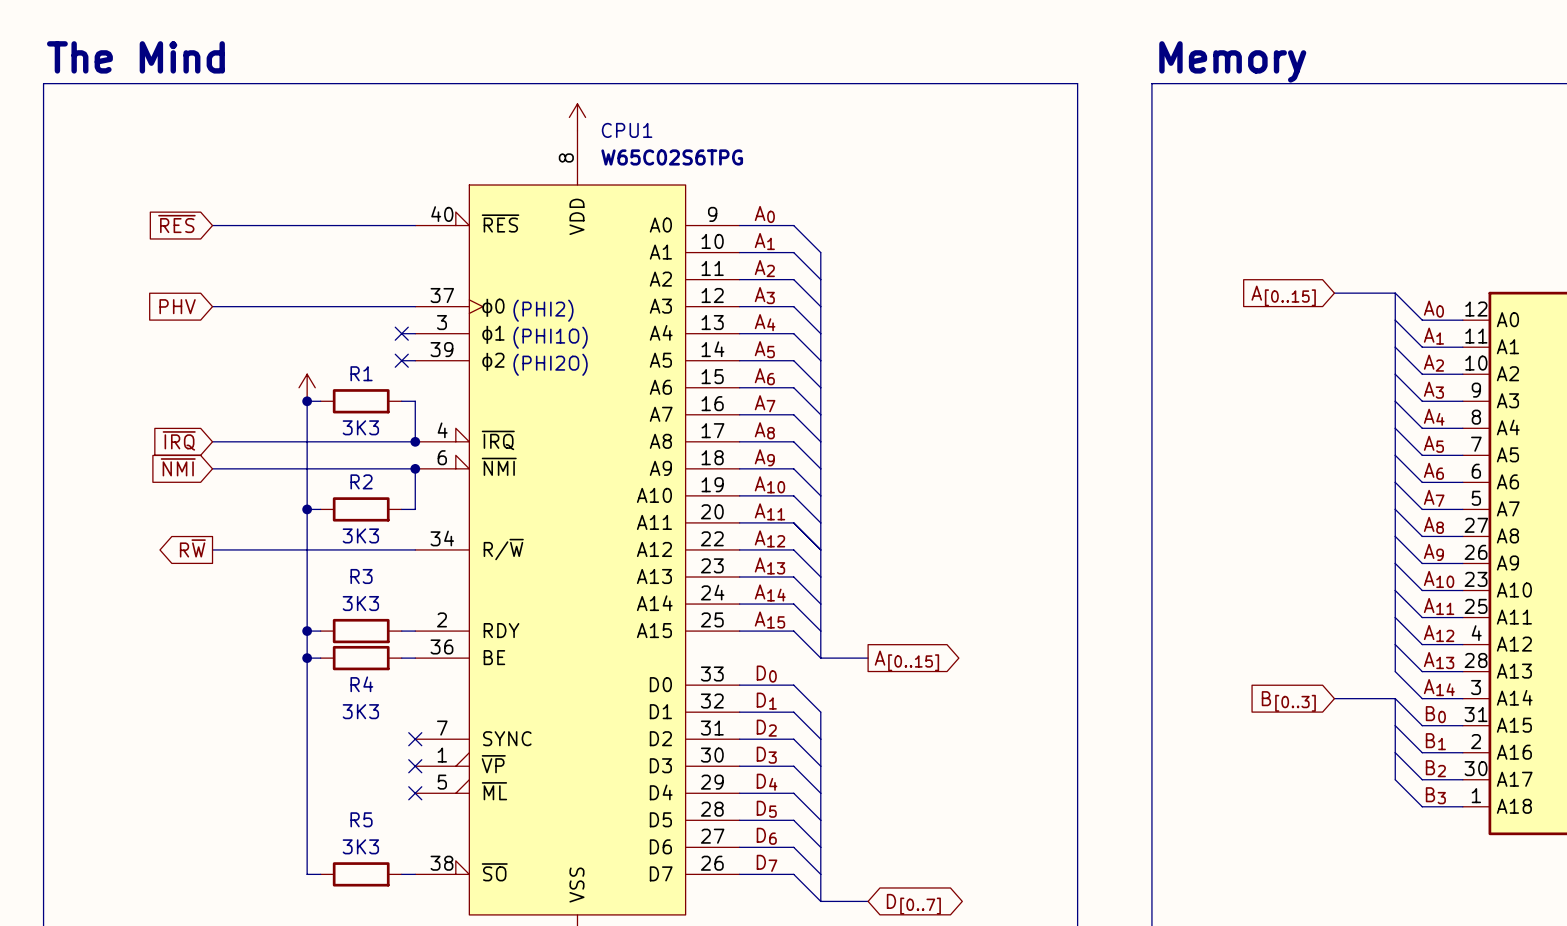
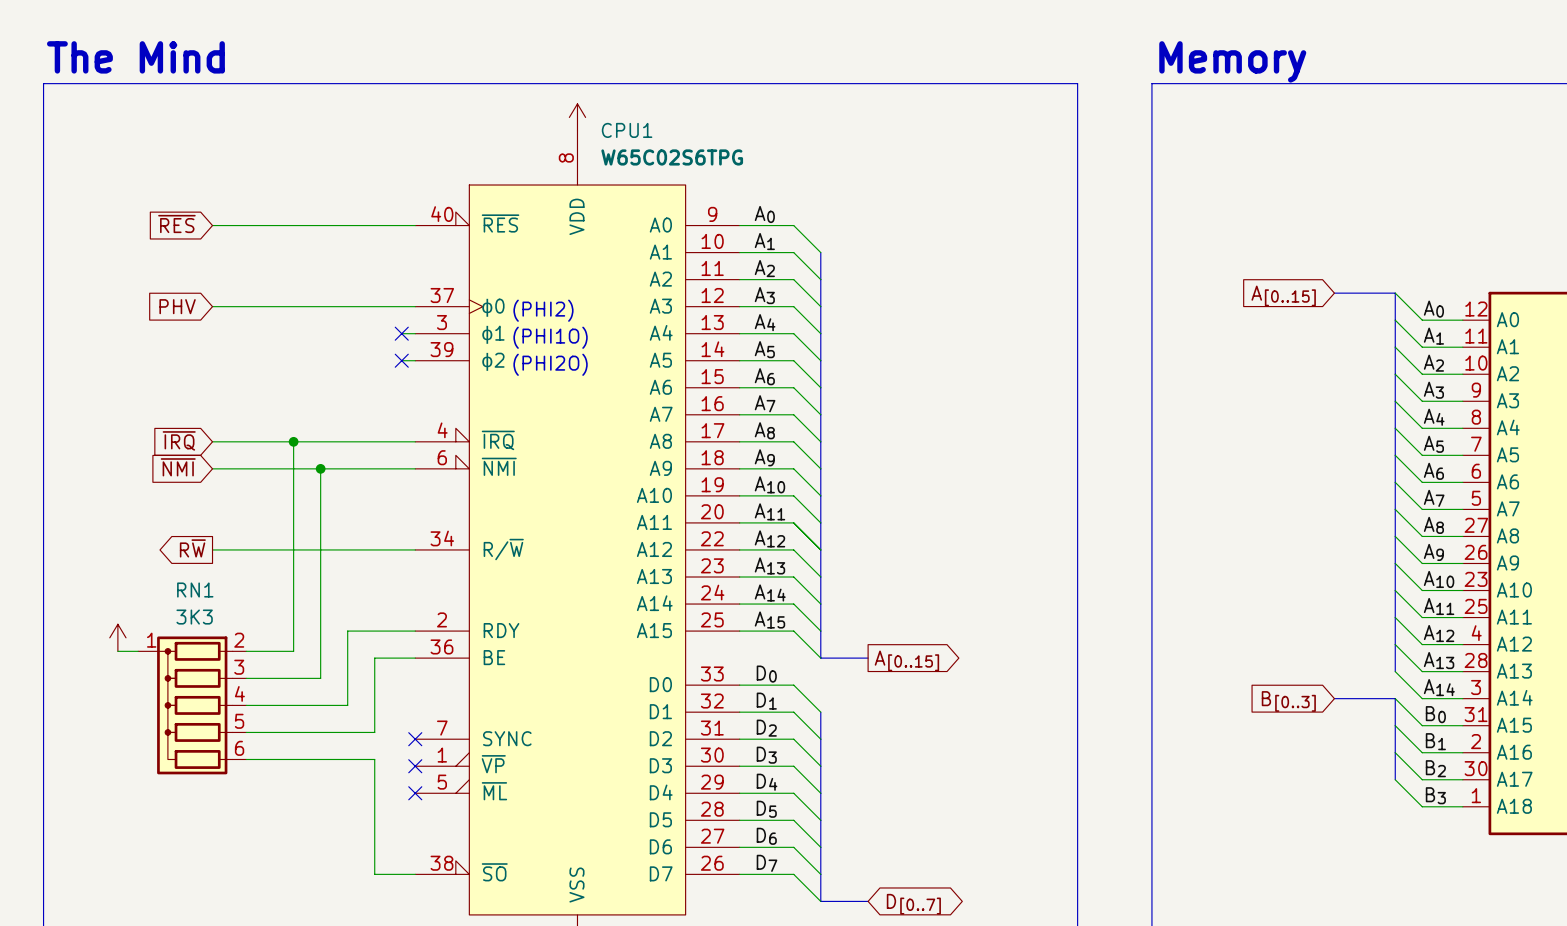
power symbol: (307, 387) -> none
junction: (307, 401) -> none
wire: (320, 401) (307, 401) (307, 631) -> none
R1: 3K3 (361, 401) -> none
wire: (401, 401) (415, 401) (415, 441) -> none
wire: none -> (293, 441) (293, 651) (246, 651)
junction: none -> (293, 441)
junction: (415, 441) -> none
wire: none -> (320, 468) (320, 678) (246, 678)
junction: none -> (320, 468)
wire: (415, 468) (415, 509) (401, 509) -> none
junction: (415, 468) -> none
wire: (307, 509) (320, 509) -> none
junction: (307, 509) -> none
R2: 3K3 (361, 509) -> none
wire: (307, 631) (320, 631) -> none
wire: (307, 631) (307, 874) (320, 874) -> none
junction: (307, 631) -> none
R3: 3K3 (361, 631) -> none
wire: none -> (401, 631) (347, 631) (347, 705) (246, 705)
power symbol: none -> (117, 637)
wire: none -> (117, 651) (138, 651)
wire: (307, 658) (320, 658) -> none
junction: (307, 658) -> none
R4: 3K3 (361, 658) -> none
wire: none -> (401, 658) (374, 658) (374, 732) (246, 732)
RN1: none -> 3K3 (192, 705)
wire: none -> (246, 759) (374, 759) (374, 874) (401, 874)
R5: 3K3 (361, 874) -> none

